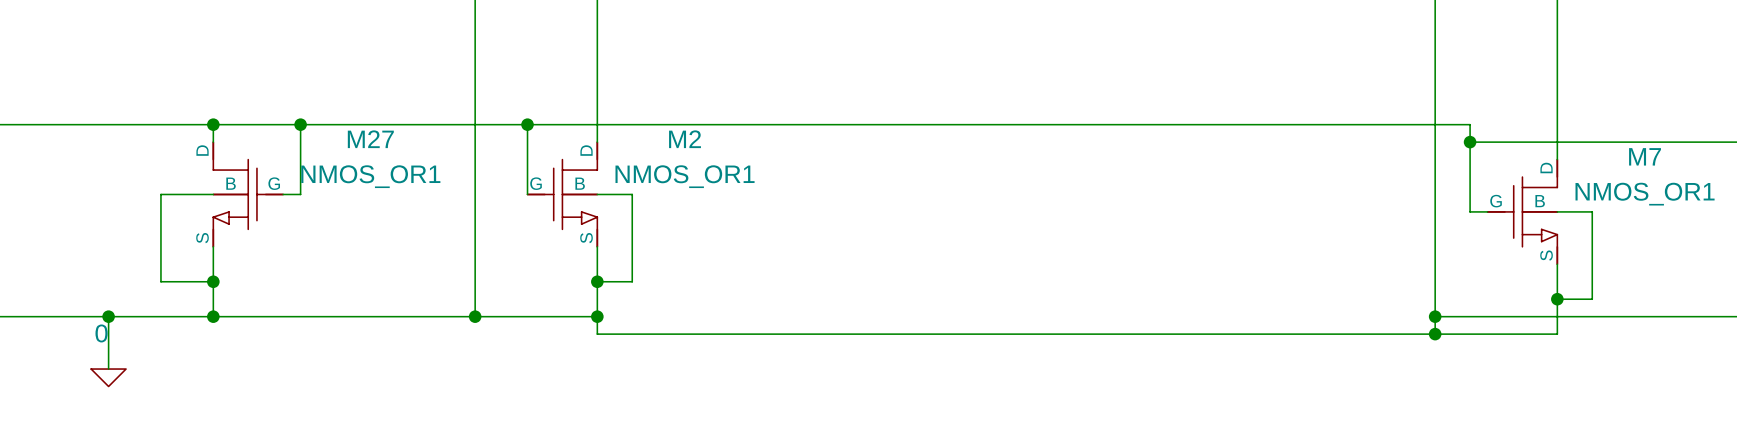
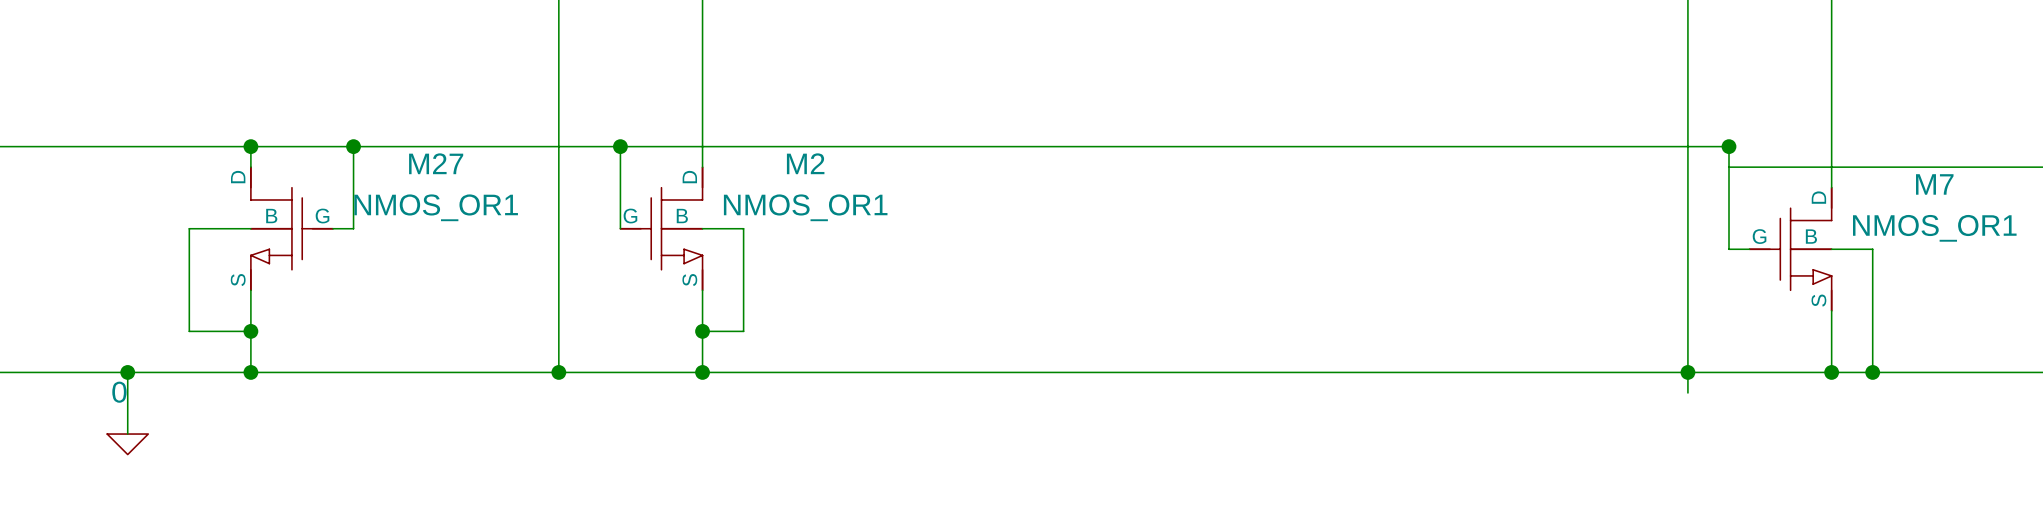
junction position: (1470, 142) -> (1729, 146)
wire: (1557, 299) (1592, 299) -> (1872, 372) (1872, 351)
junction position: (1557, 299) -> (1831, 372)
wire: (597, 316) (597, 334) (1557, 334) (1557, 316) -> (702, 372) (1687, 372)
junction: none -> (1872, 372)
junction: (1435, 334) -> none

